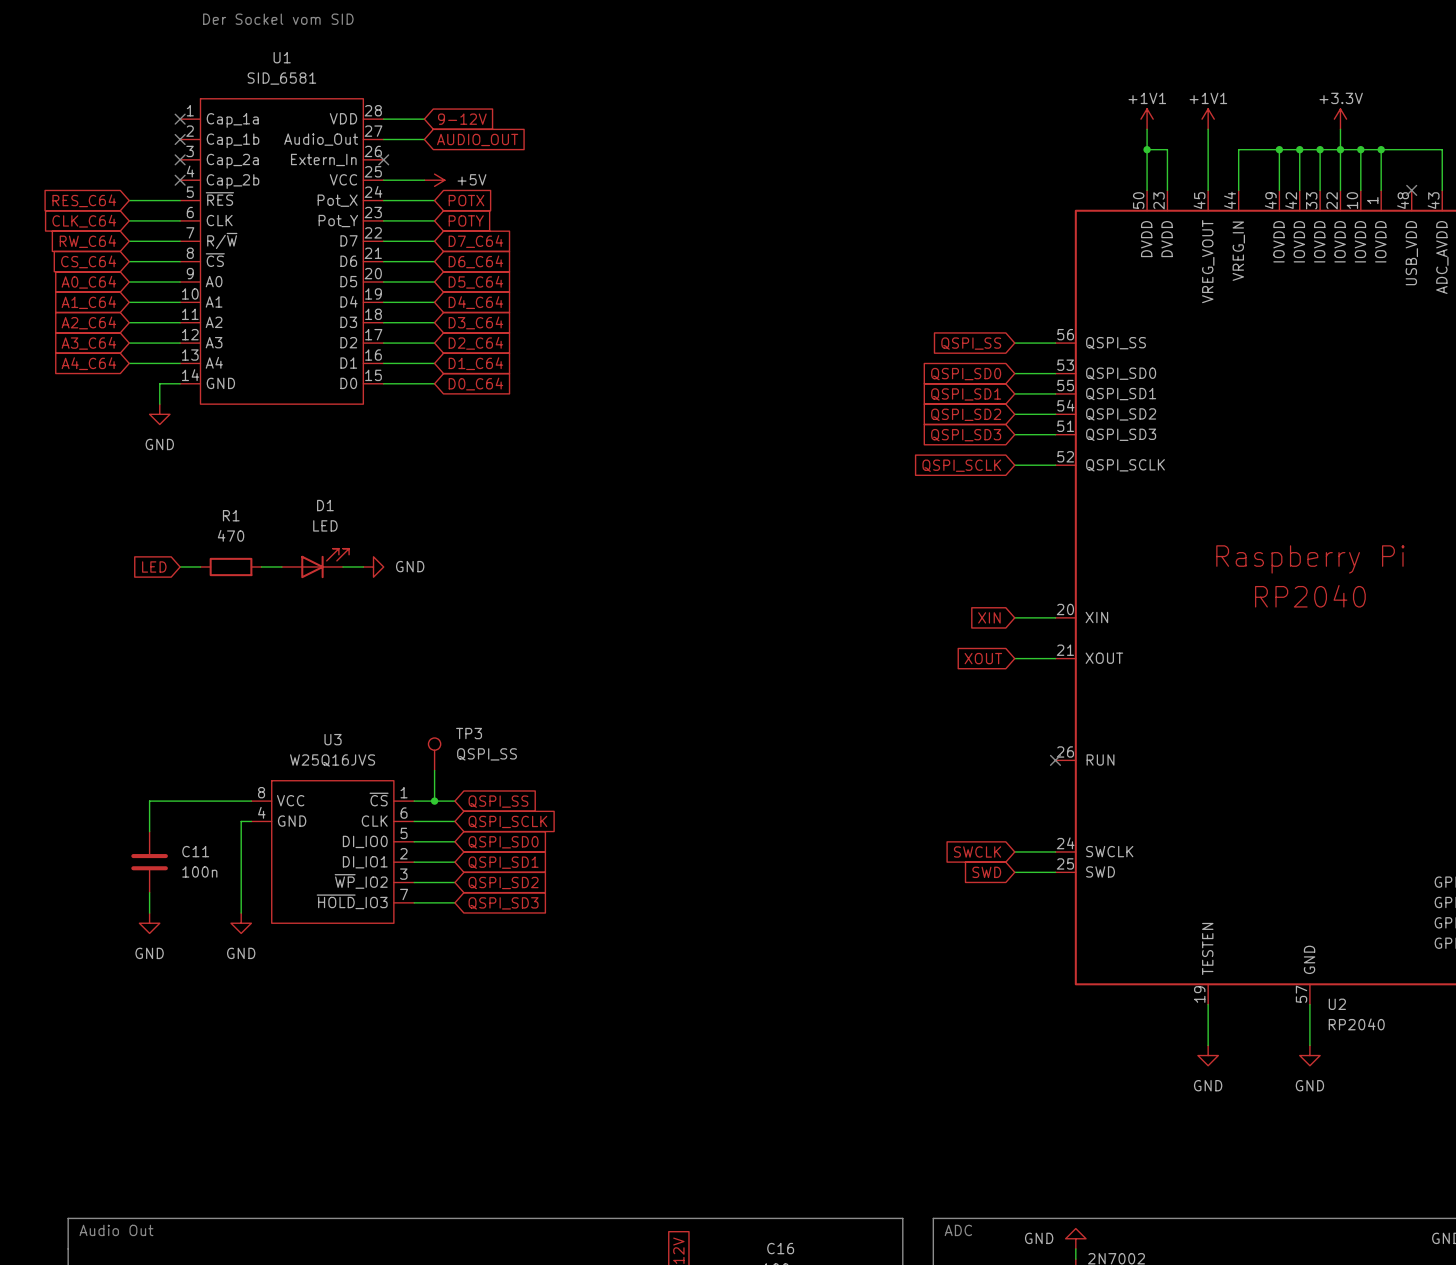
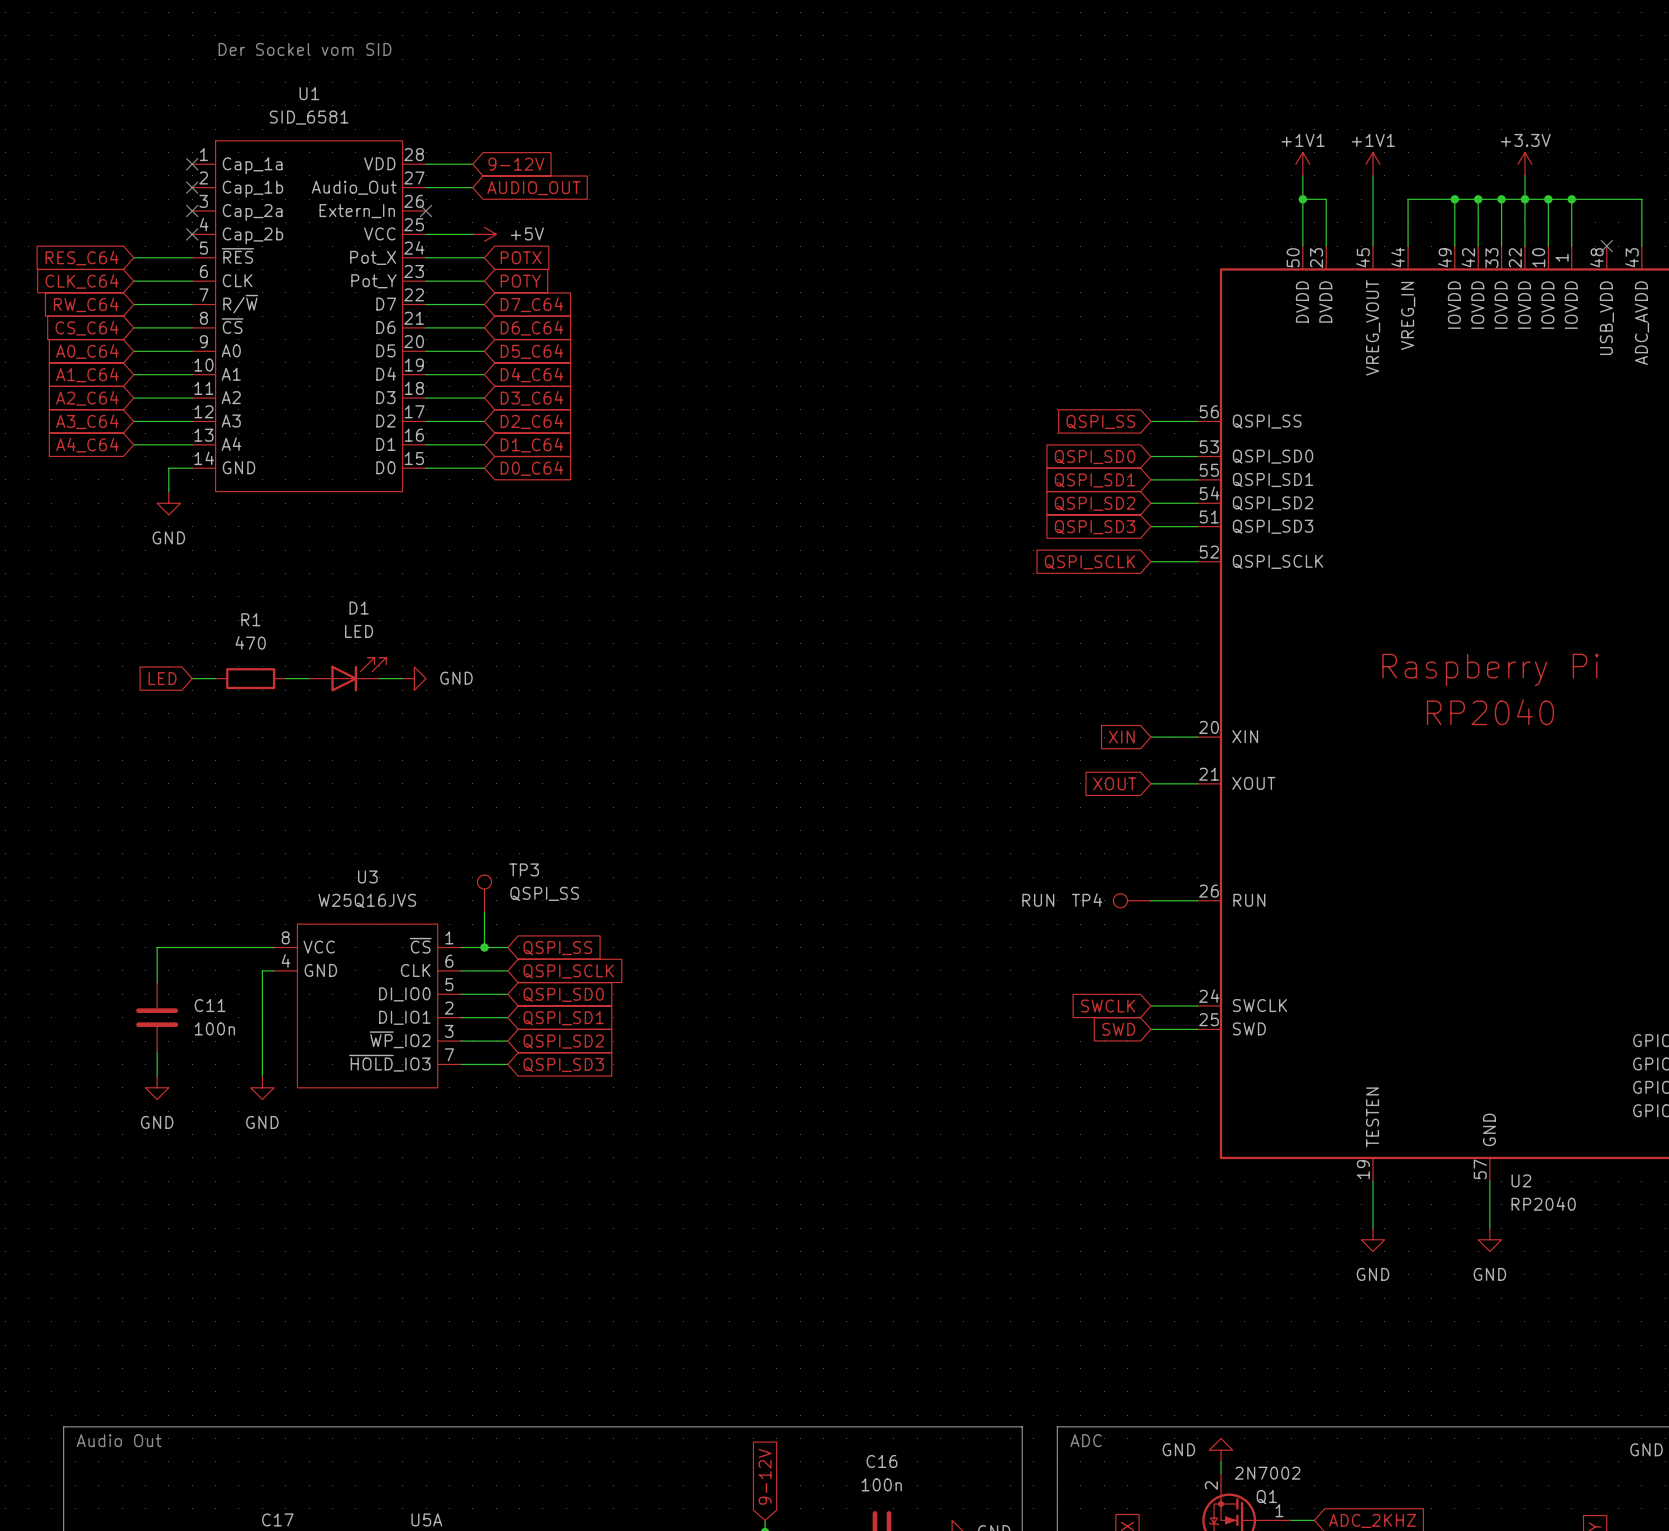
TP4: none -> RUN (1132, 900)
wire: none -> (1150, 900) (1197, 900)
no-connect mark: (1055, 760) -> none

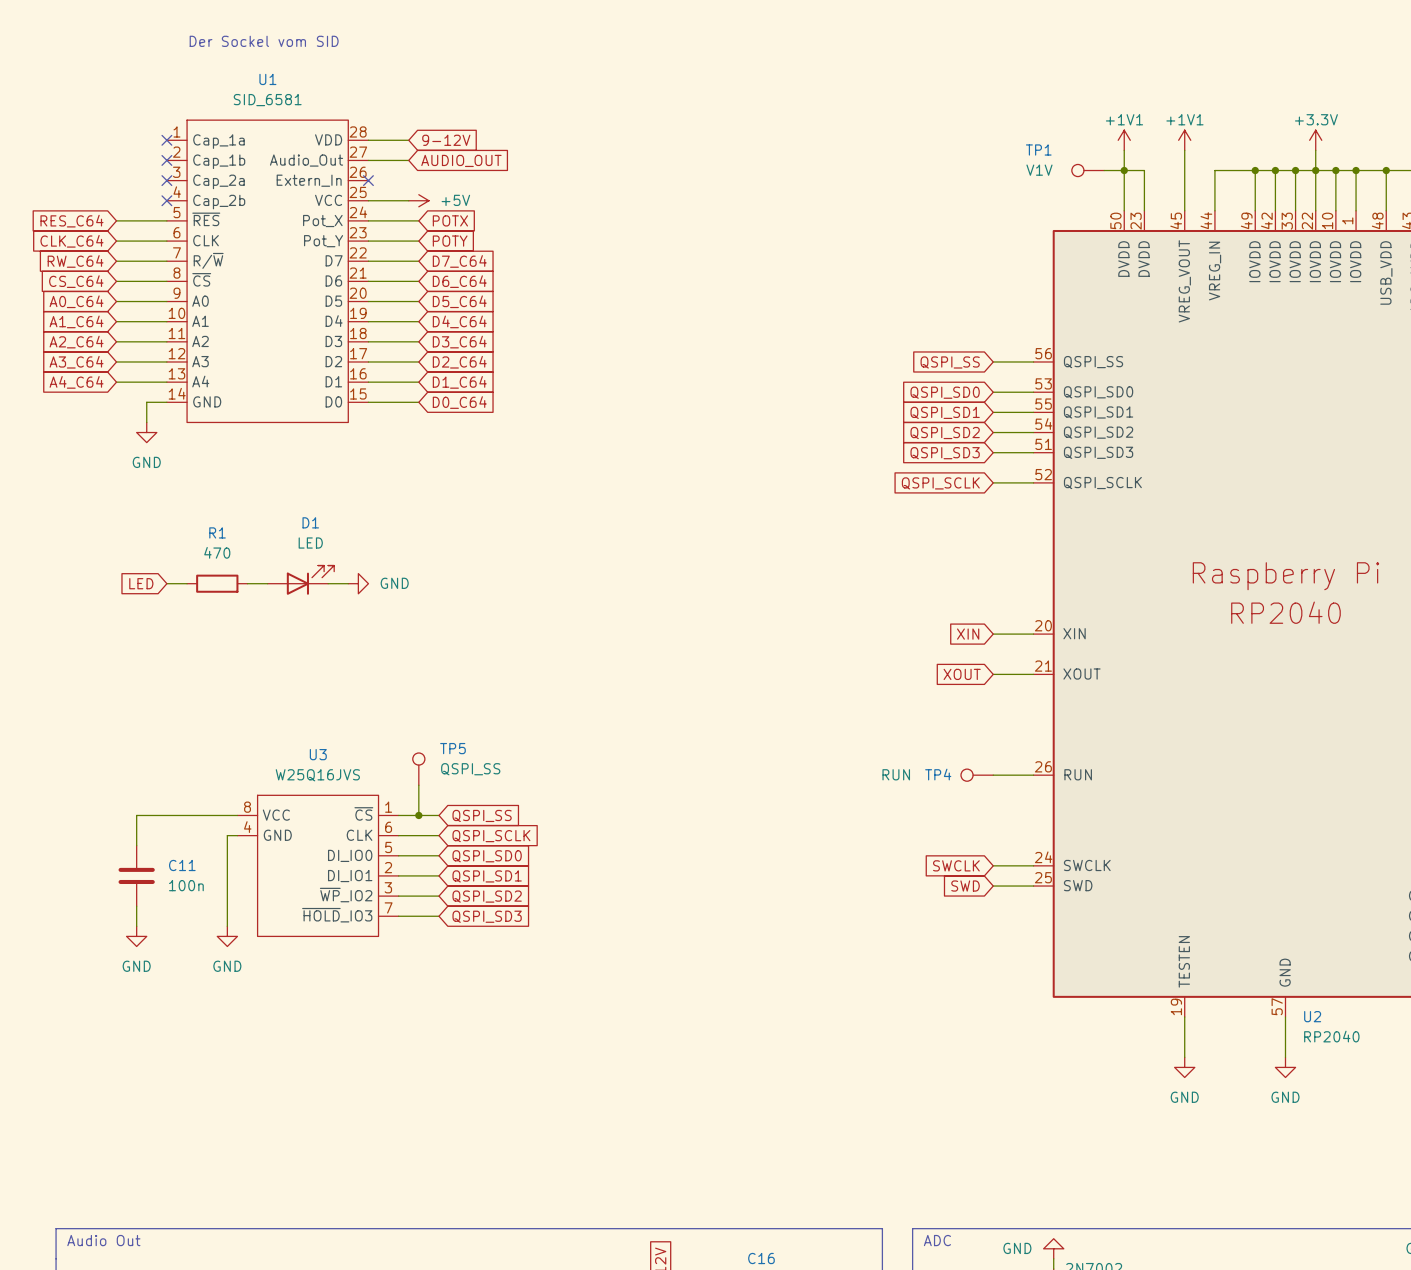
TP1: none -> V1V (1087, 170)
wire: none -> (1104, 170) (1124, 170)
wire: none -> (1386, 170) (1386, 210)
junction: none -> (1386, 170)
no-connect mark: (1606, 246) -> none
TP3 name: TP3 (524, 869) -> TP5 (452, 748)

